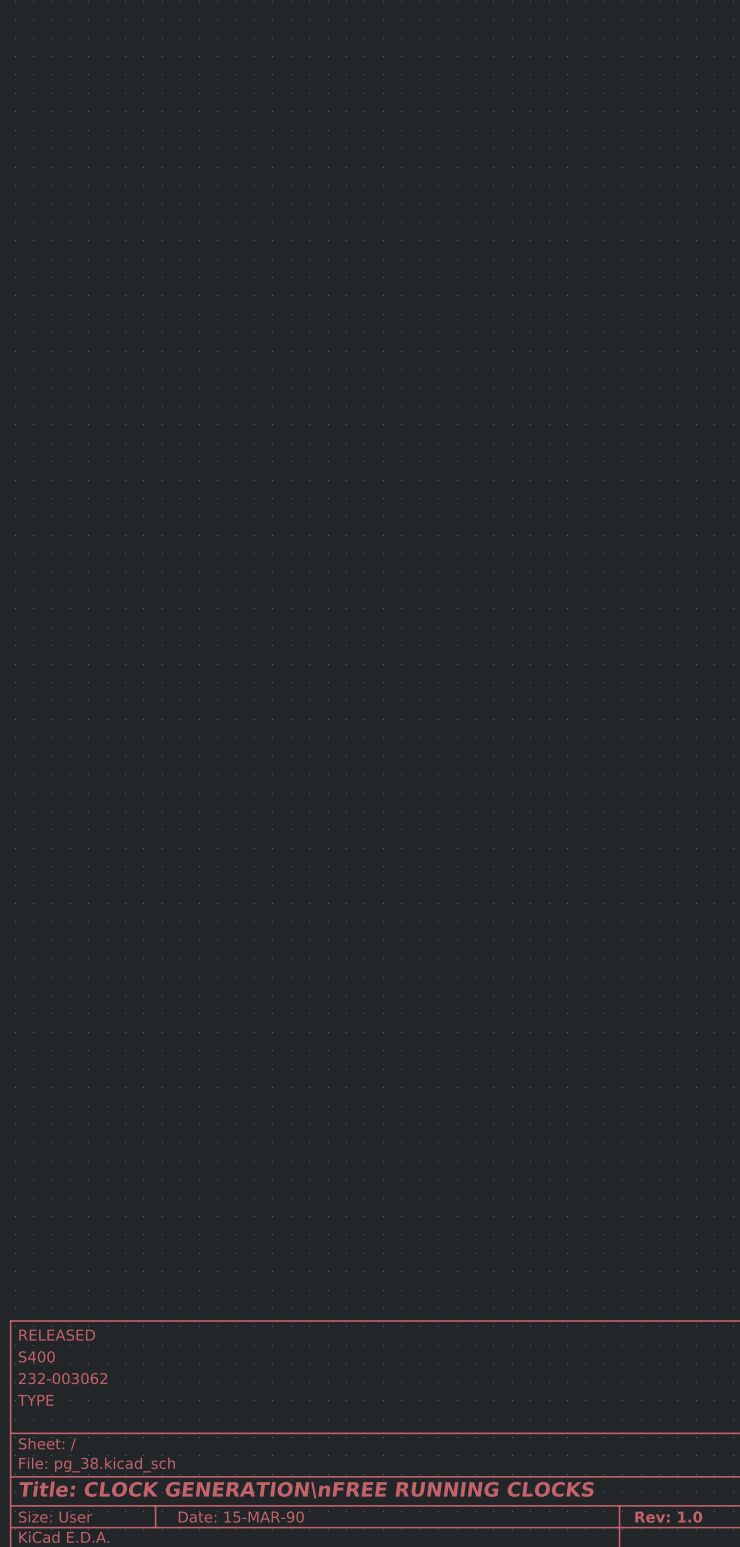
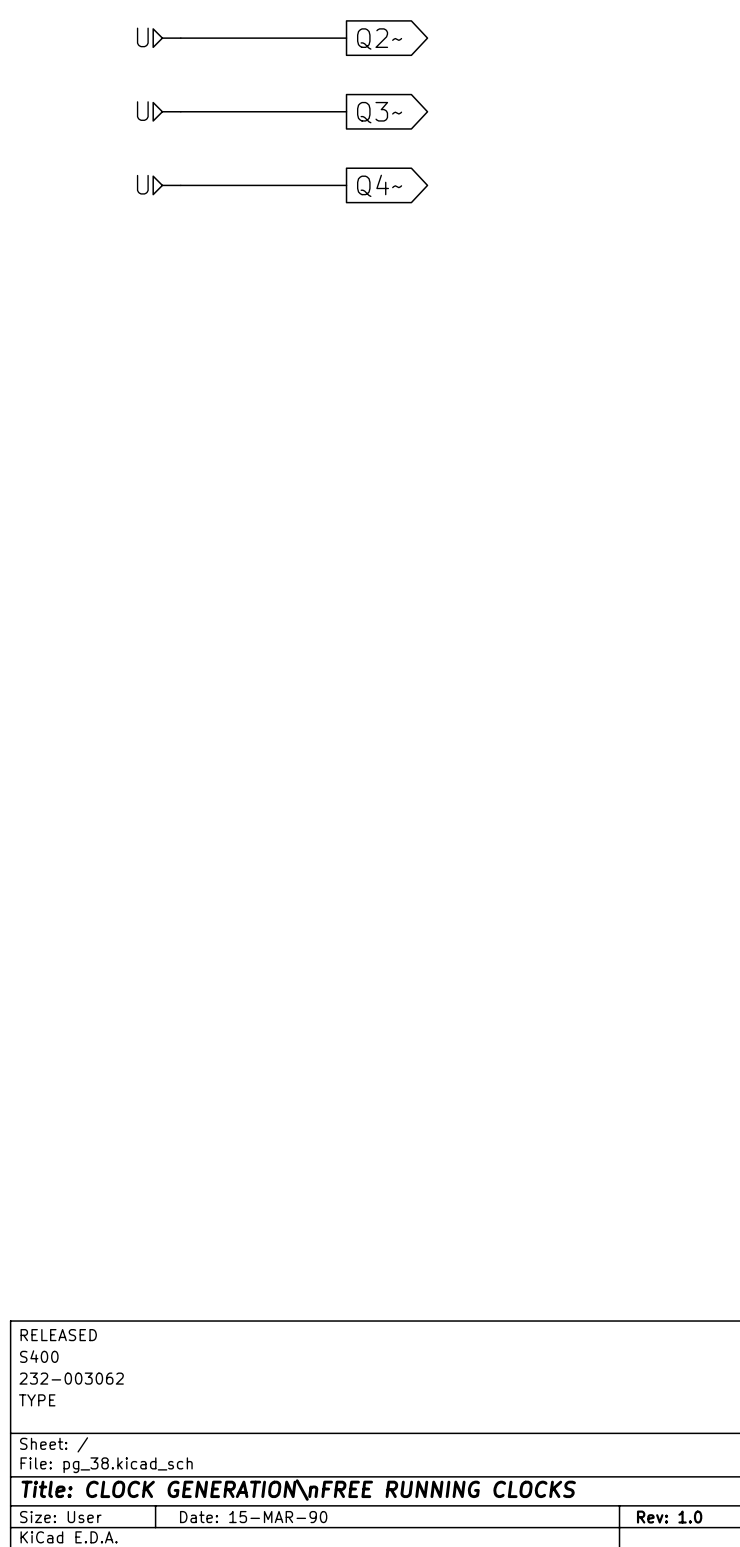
U: none -> (166, 38)
wire: none -> (180, 38) (346, 38)
global label: none -> Q2~ (379, 38)
U: none -> (166, 111)
wire: none -> (180, 111) (346, 111)
global label: none -> Q3~ (379, 112)
U: none -> (166, 185)
wire: none -> (180, 185) (346, 185)
global label: none -> Q4~ (379, 185)

